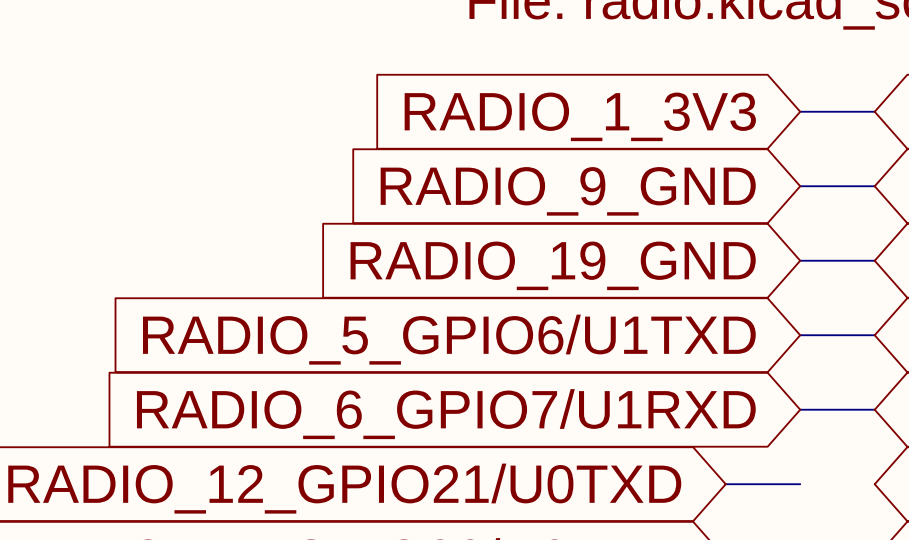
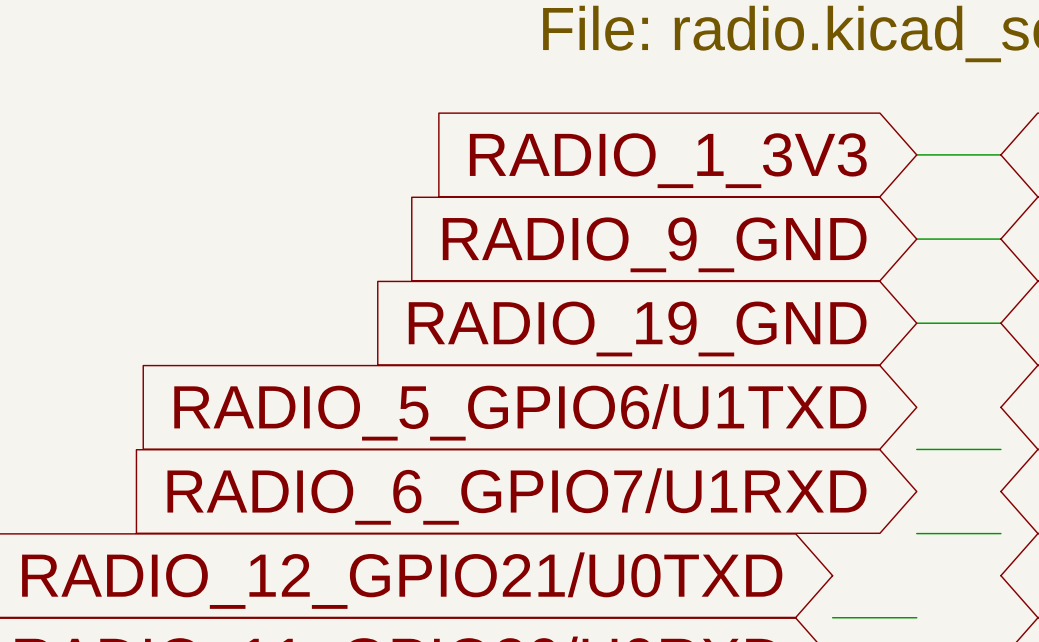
wire: (800, 335) (874, 335) -> (916, 449) (1000, 449)
wire: (800, 409) (874, 409) -> (916, 533) (1000, 533)
wire: (725, 484) (800, 484) -> (832, 617) (916, 617)

